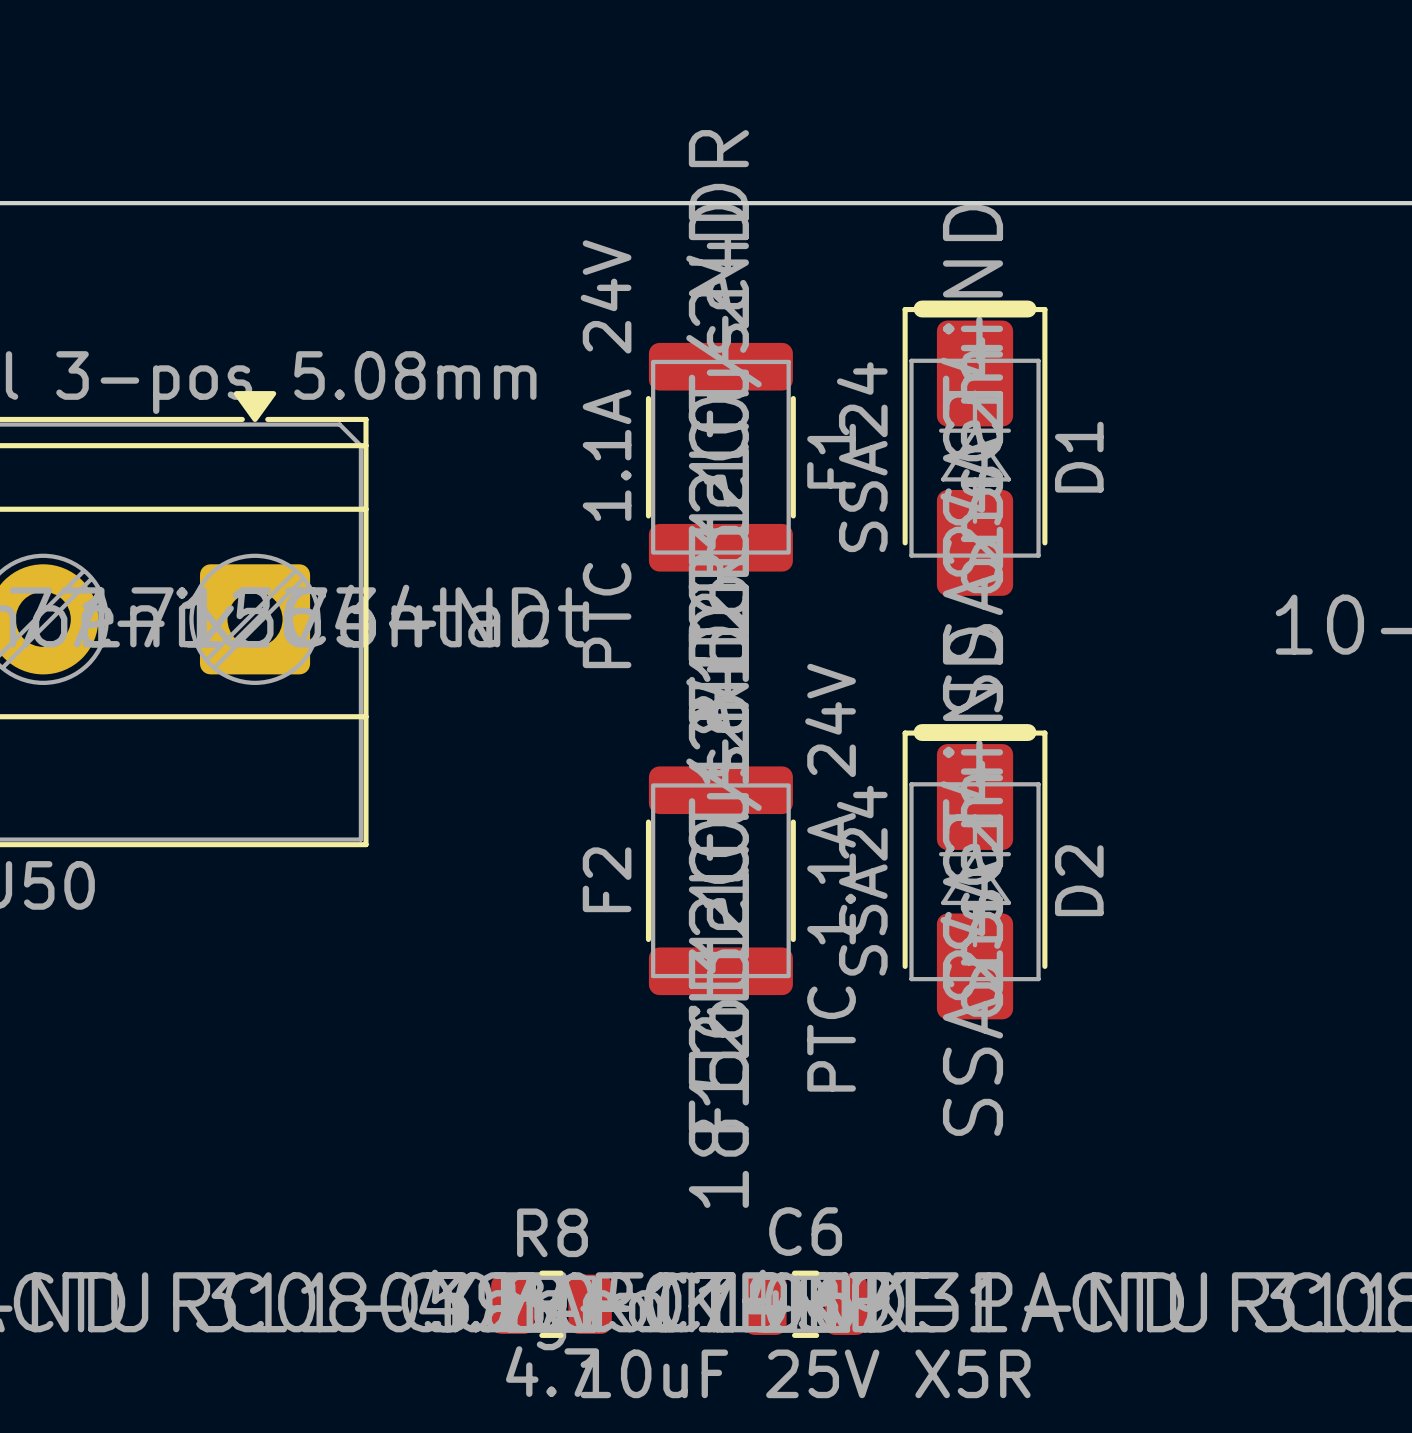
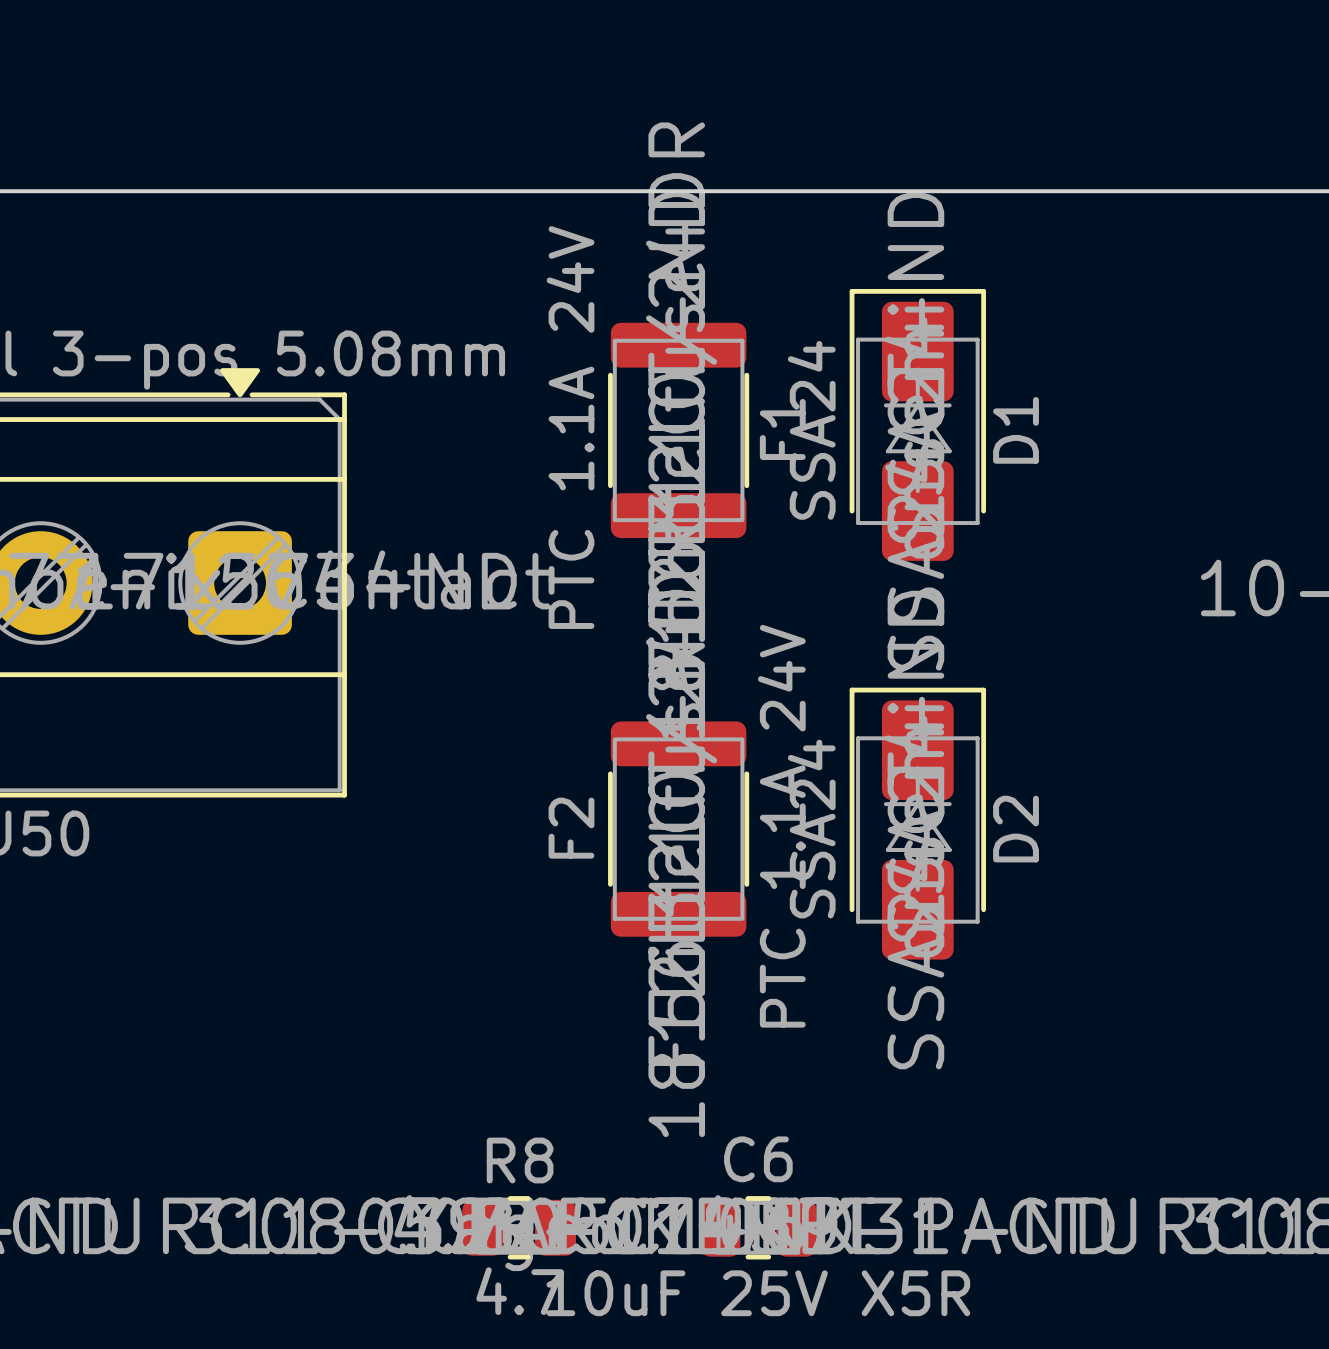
D1 footprint: [902, 300, 1048, 596] -> [849, 288, 987, 561]
D2 footprint: [902, 724, 1048, 1020] -> [849, 687, 987, 960]

